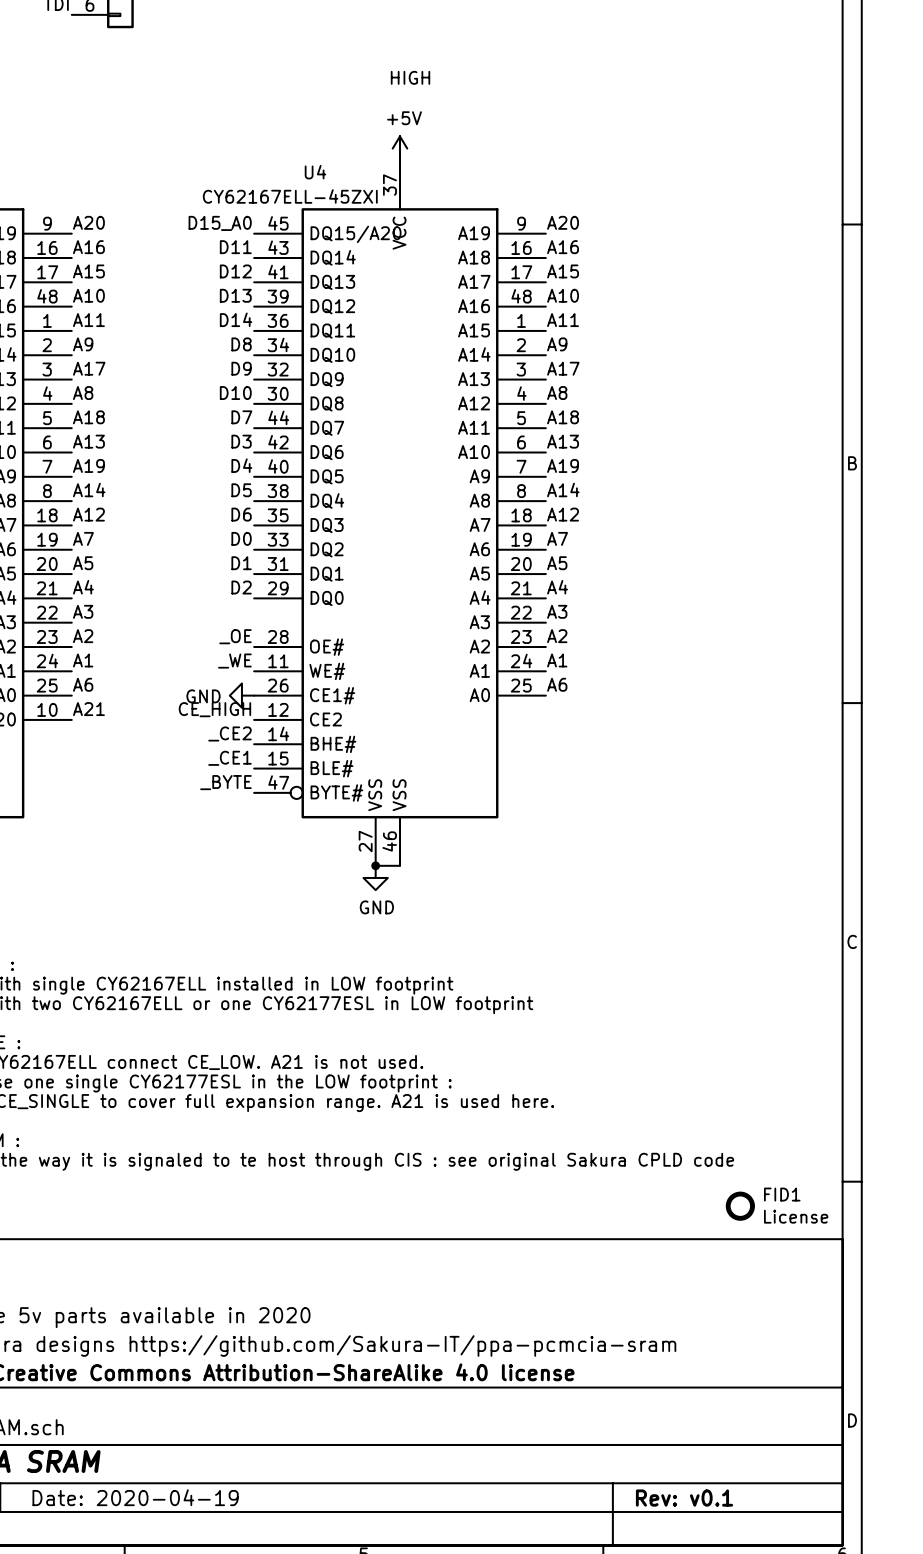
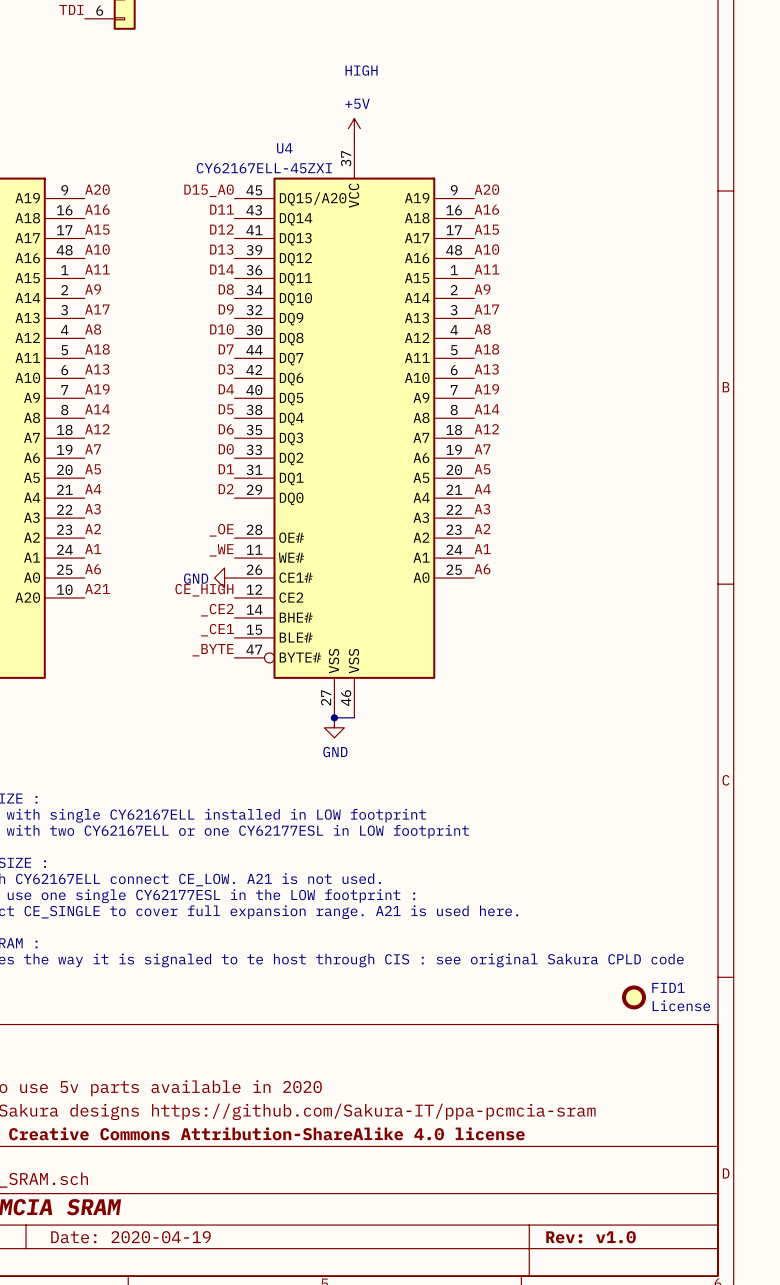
title block: Rev: v0.1 (684, 1498) -> Rev: v1.0 (591, 1237)

